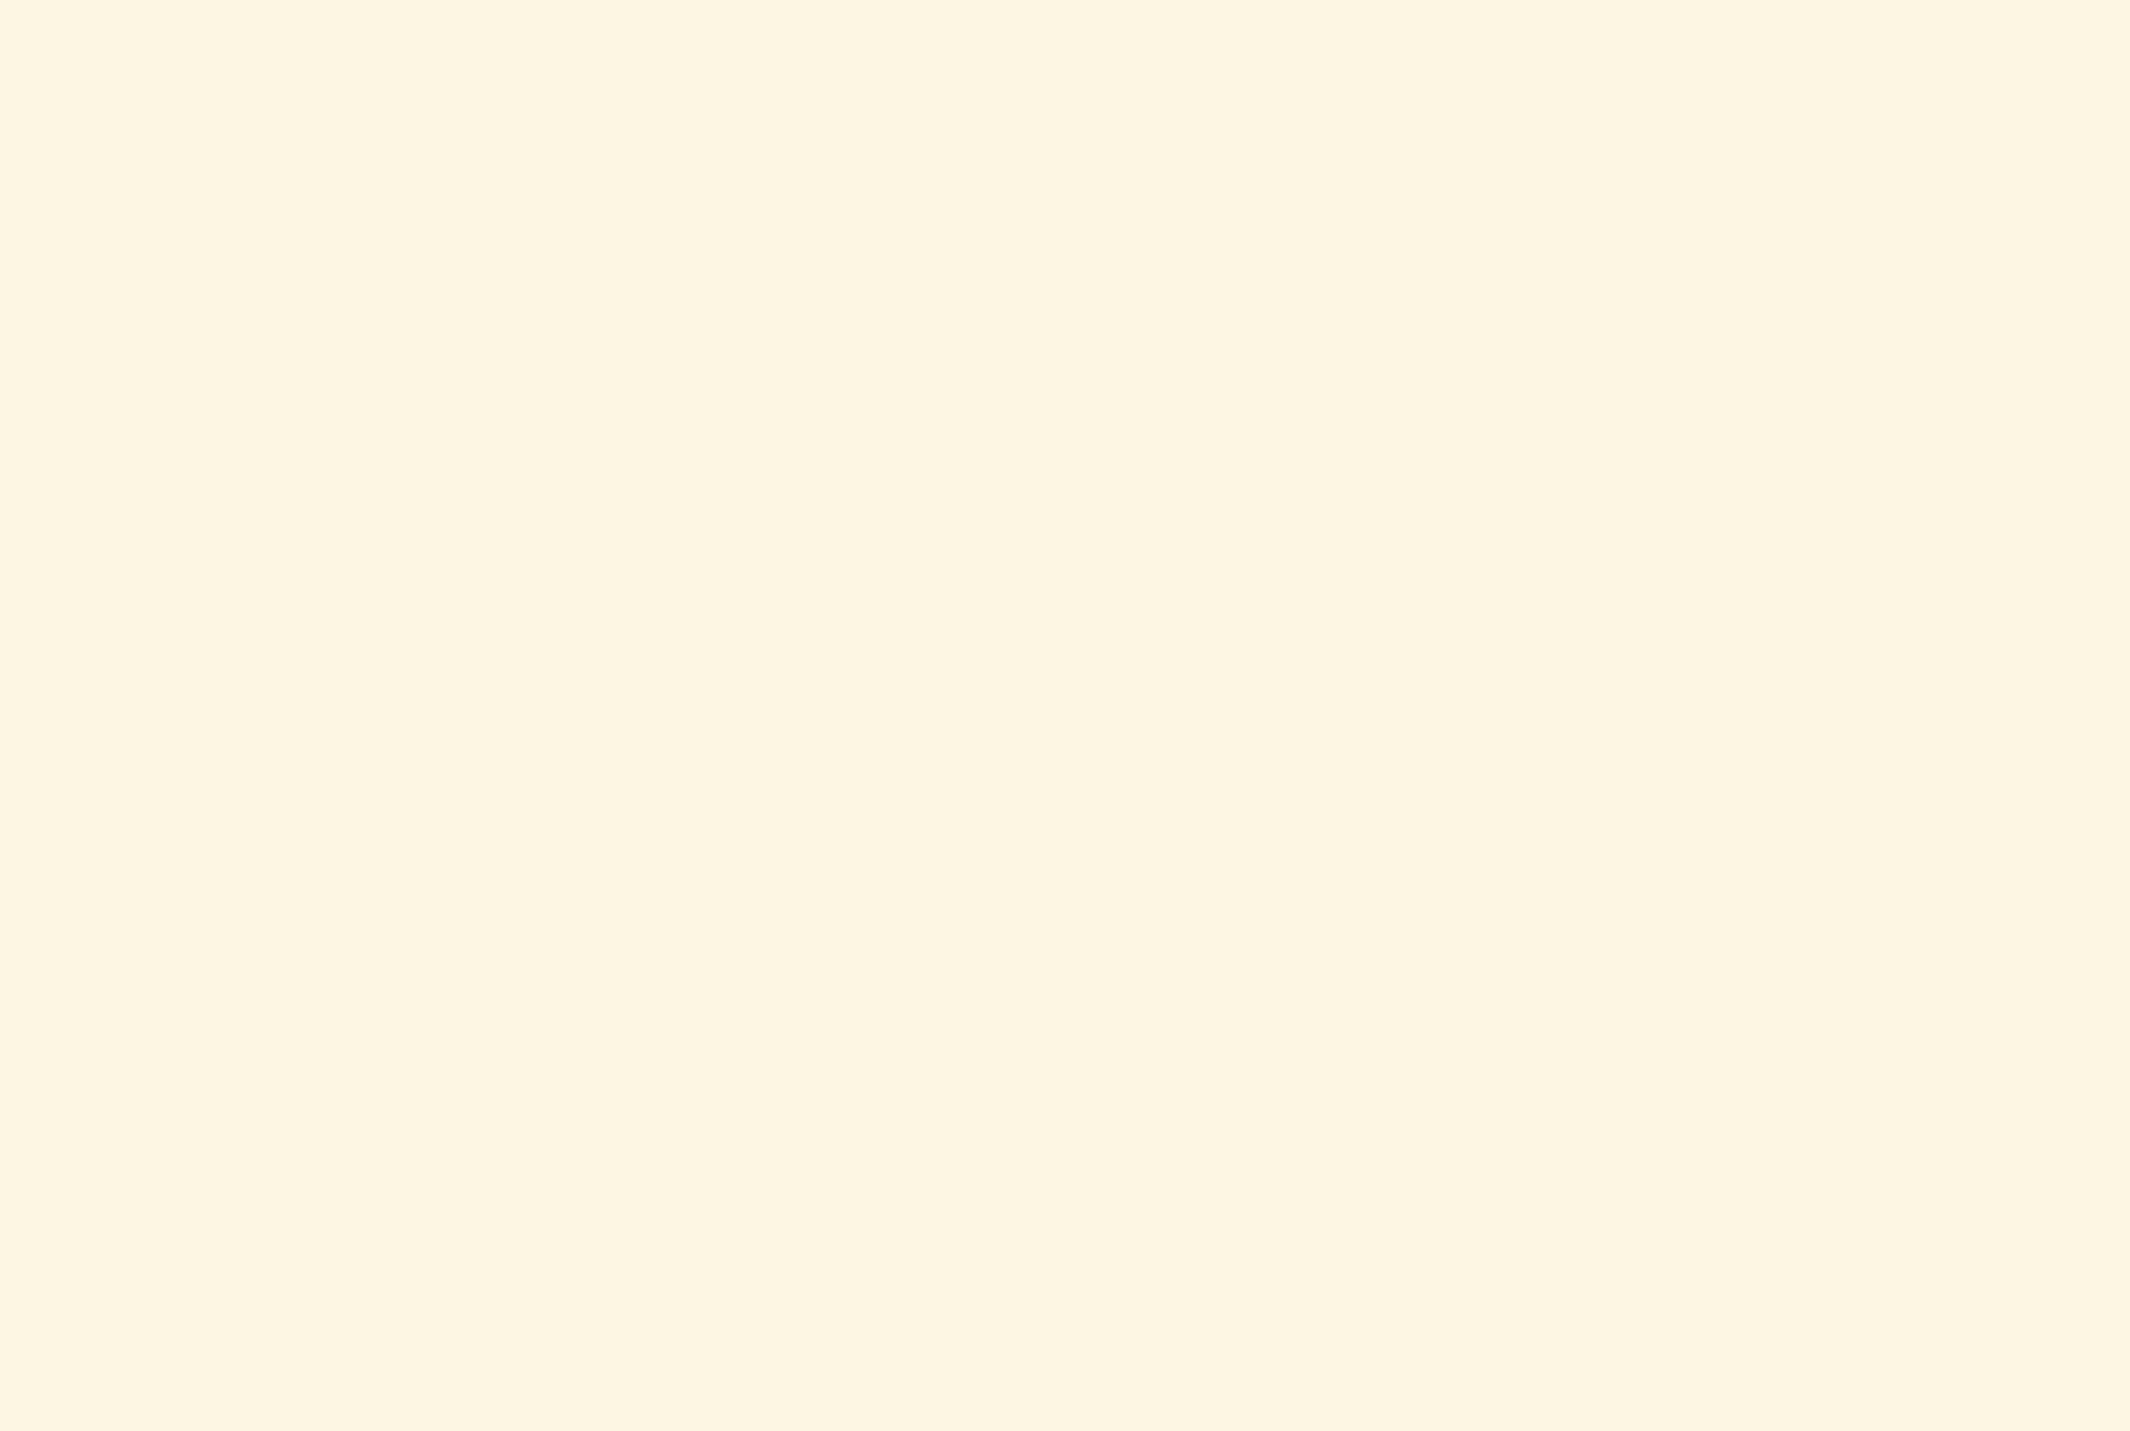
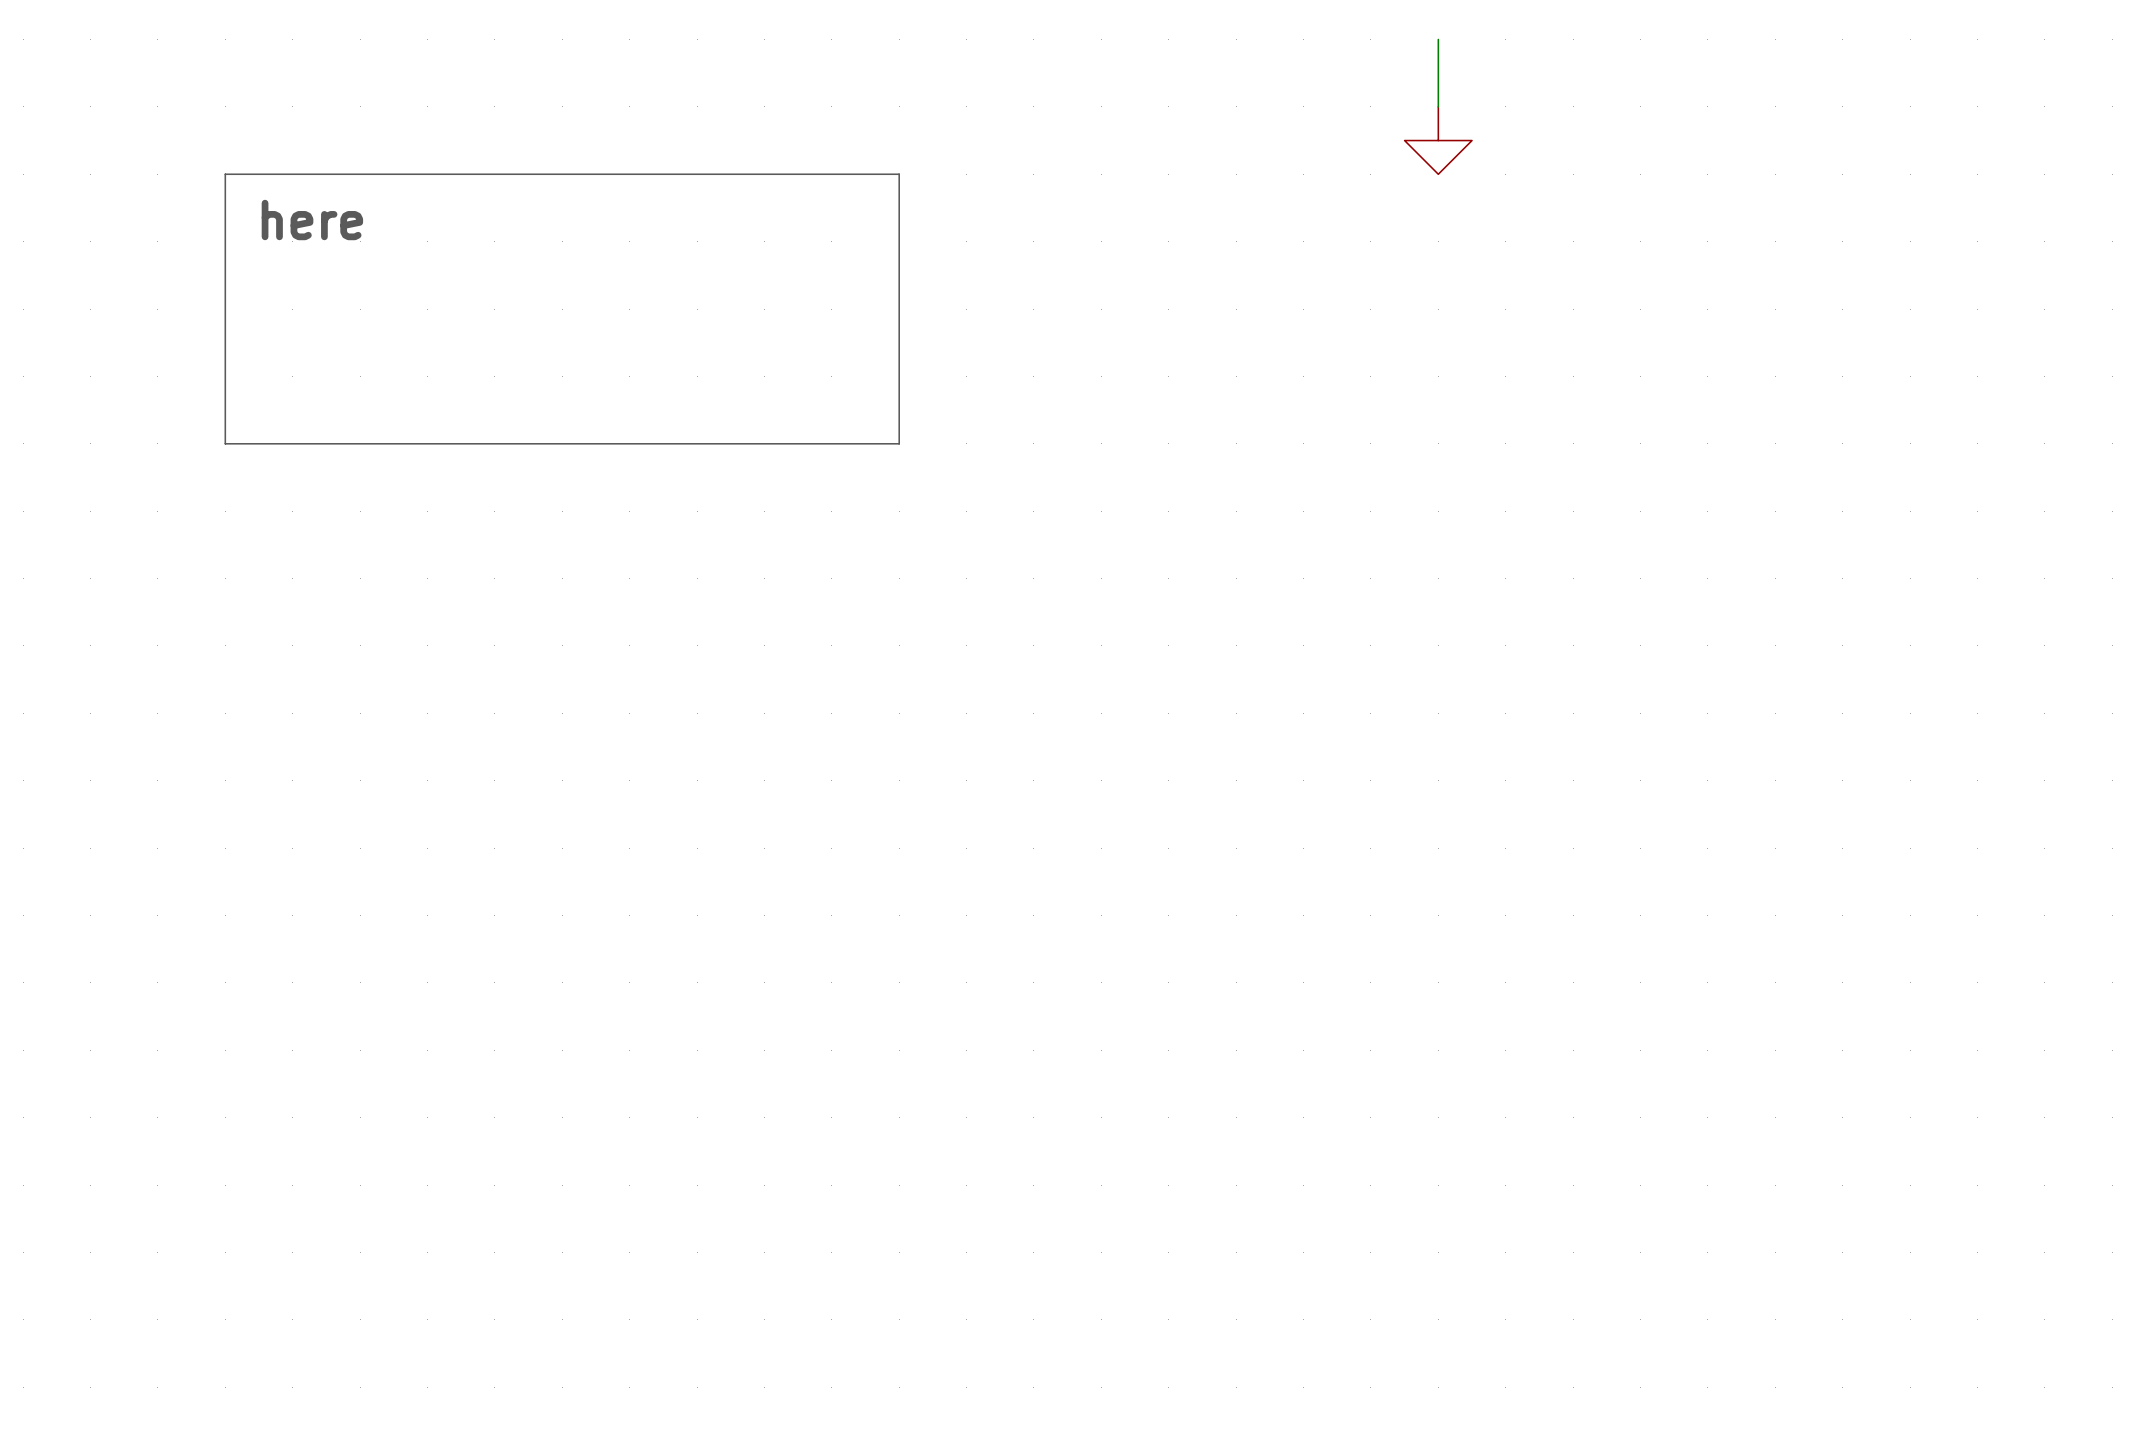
wire: none -> (1438, 39) (1438, 106)
power symbol: none -> (1438, 140)
line: none -> (225, 174) (899, 174) (899, 443) (225, 443) (225, 174)
text: none -> here (312, 219)

